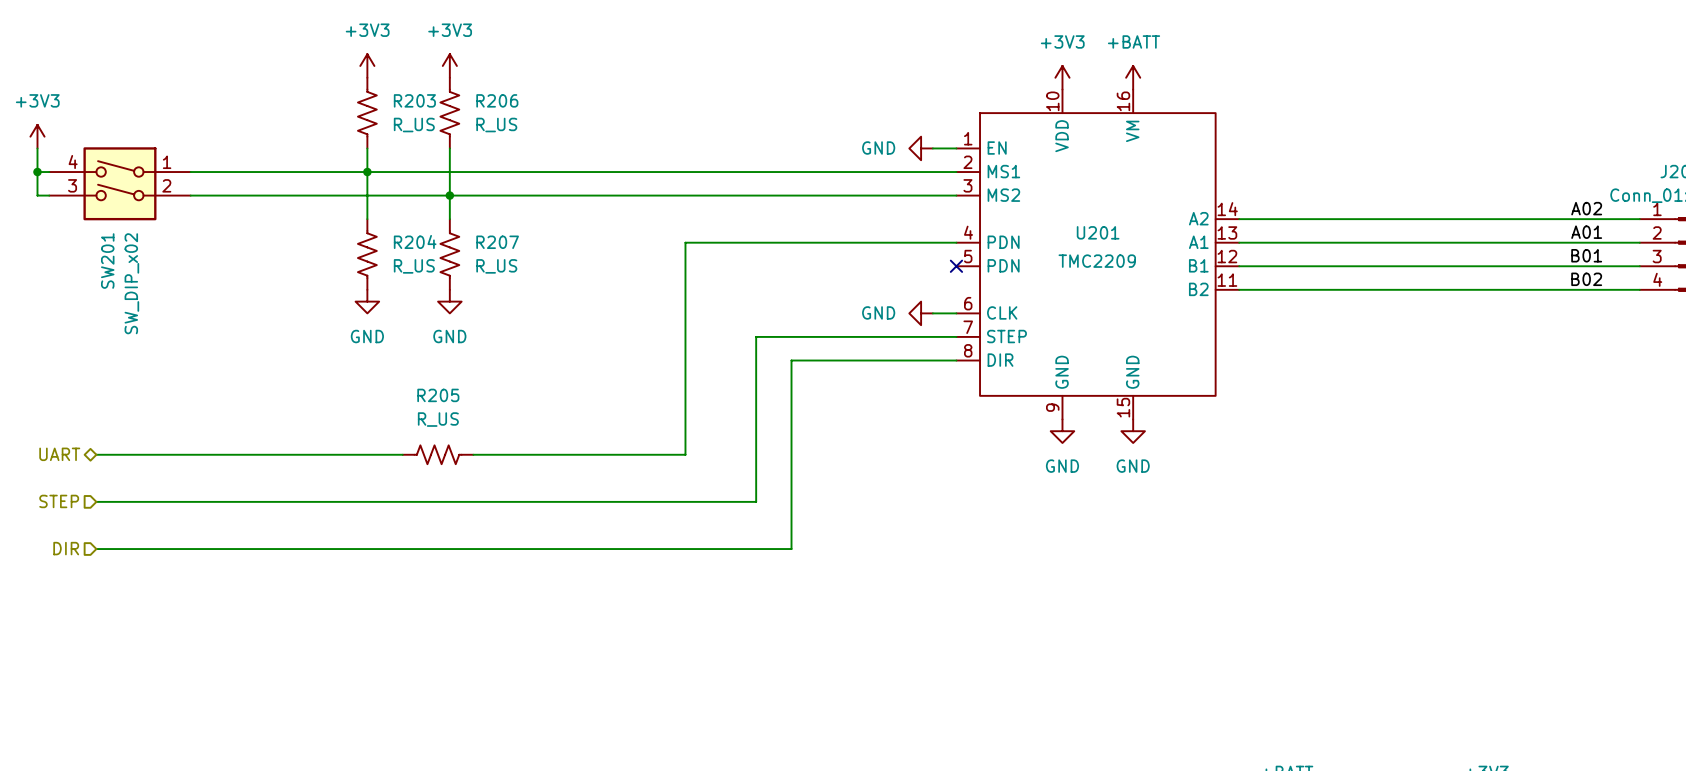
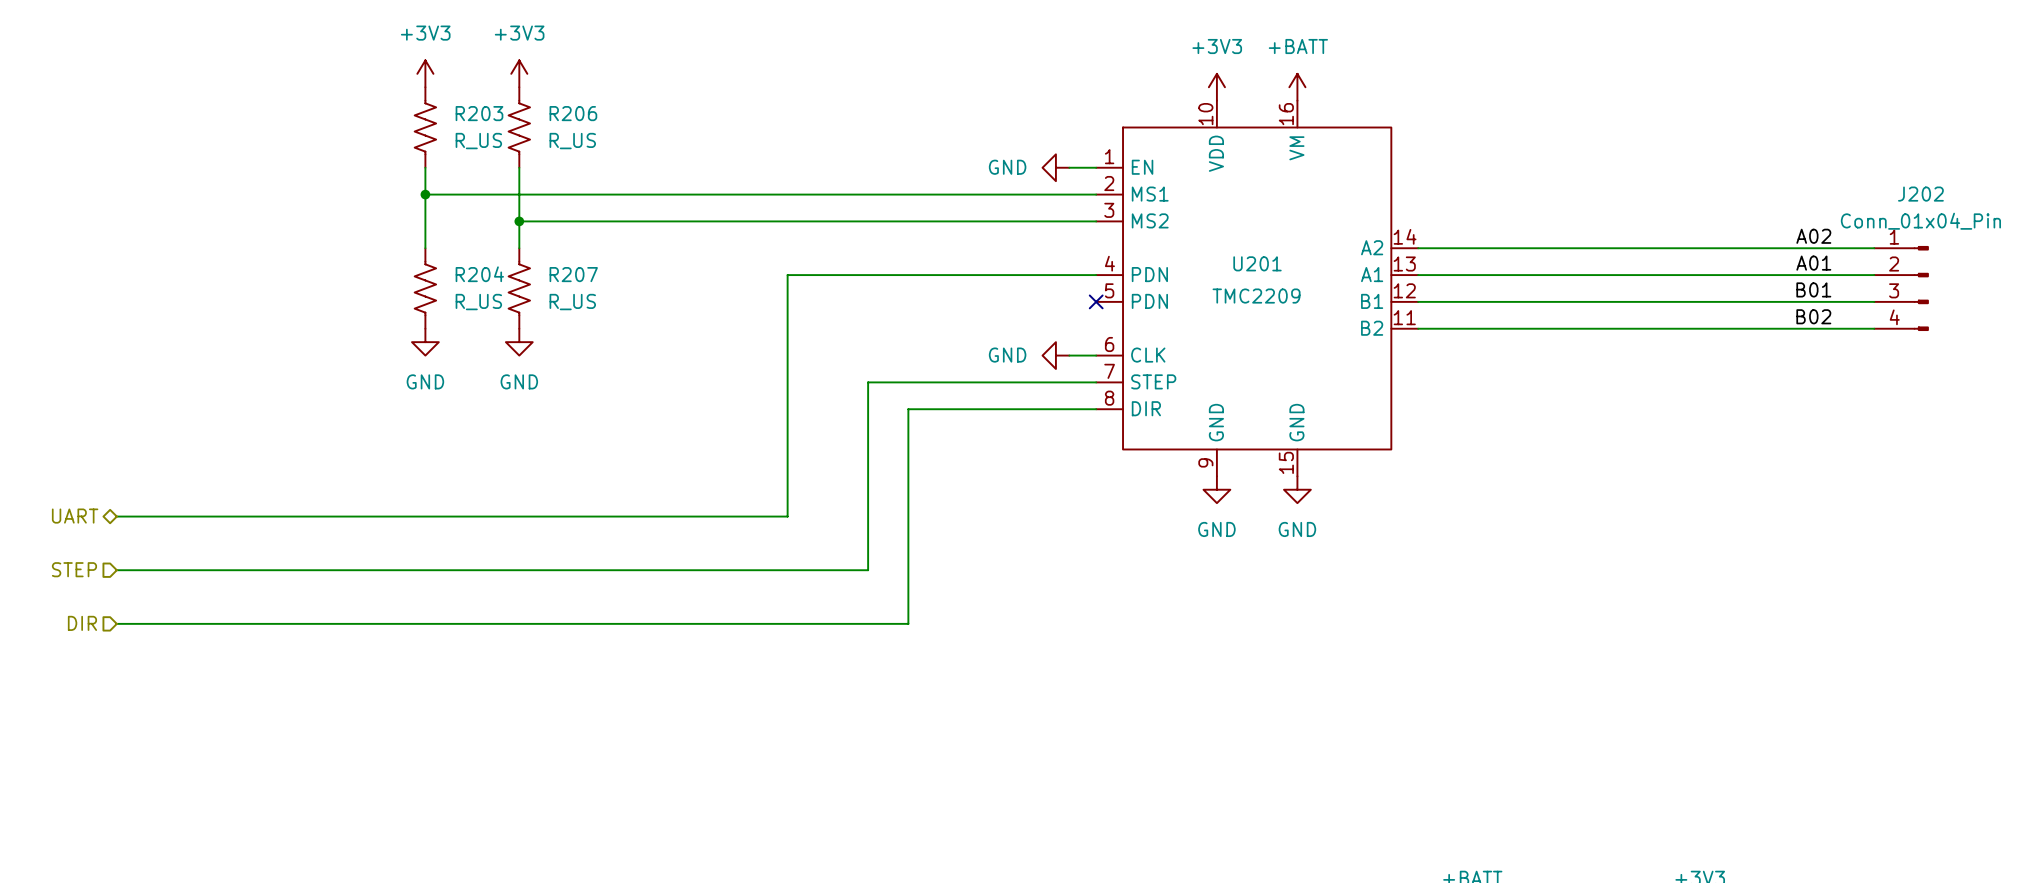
power symbol: +3V3 (37, 136) -> none
wire: (37, 148) (37, 195) (49, 195) -> none
wire: (37, 172) (49, 172) -> none
junction: (37, 172) -> none
wire: (190, 172) (367, 172) -> none
SW201: SW_DIP_x02 (119, 183) -> none
wire: (190, 195) (449, 195) -> none
R205: R_US (438, 454) -> none

